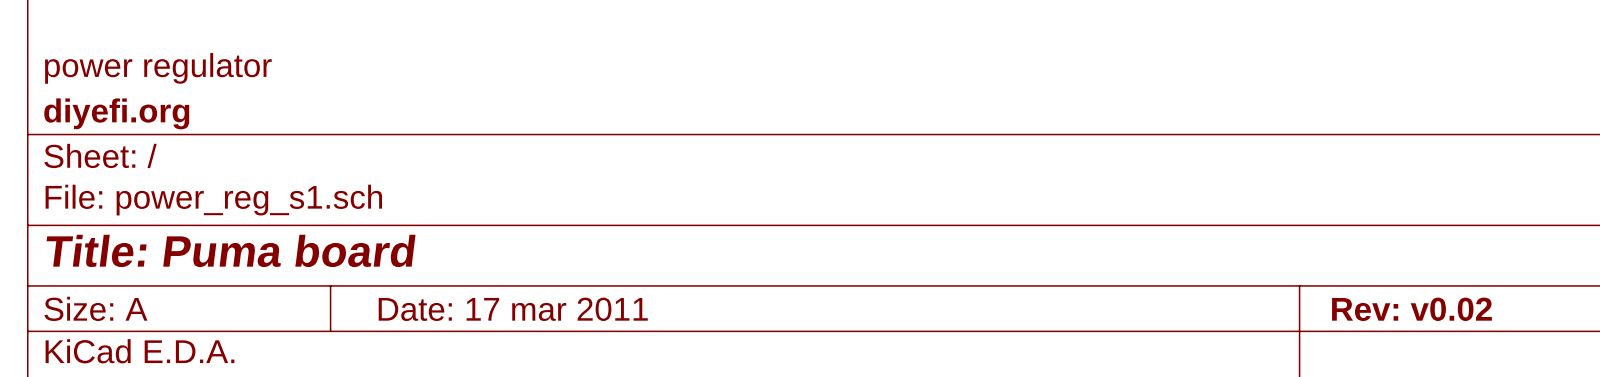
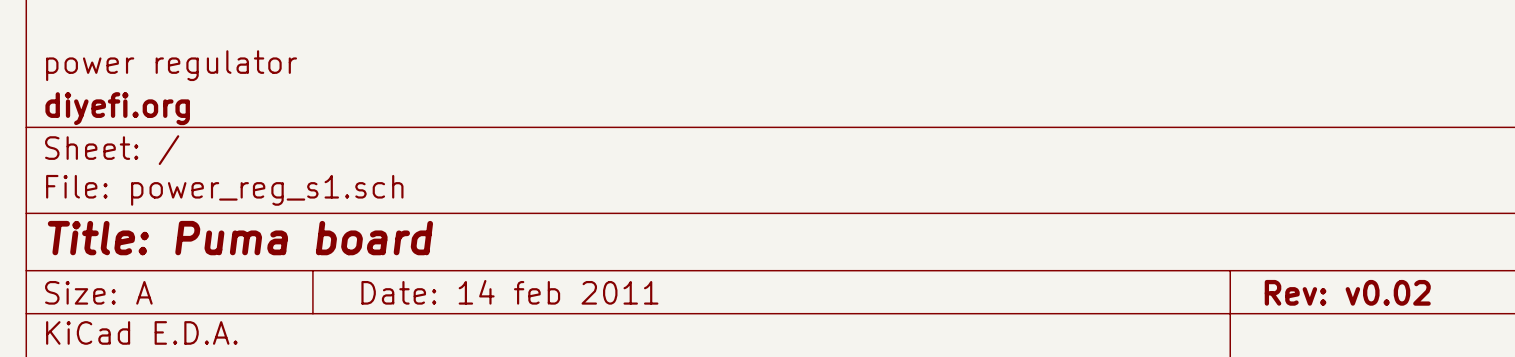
title block: Date: 17 mar 2011 (513, 309) -> Date: 14 feb 2011 (509, 292)

